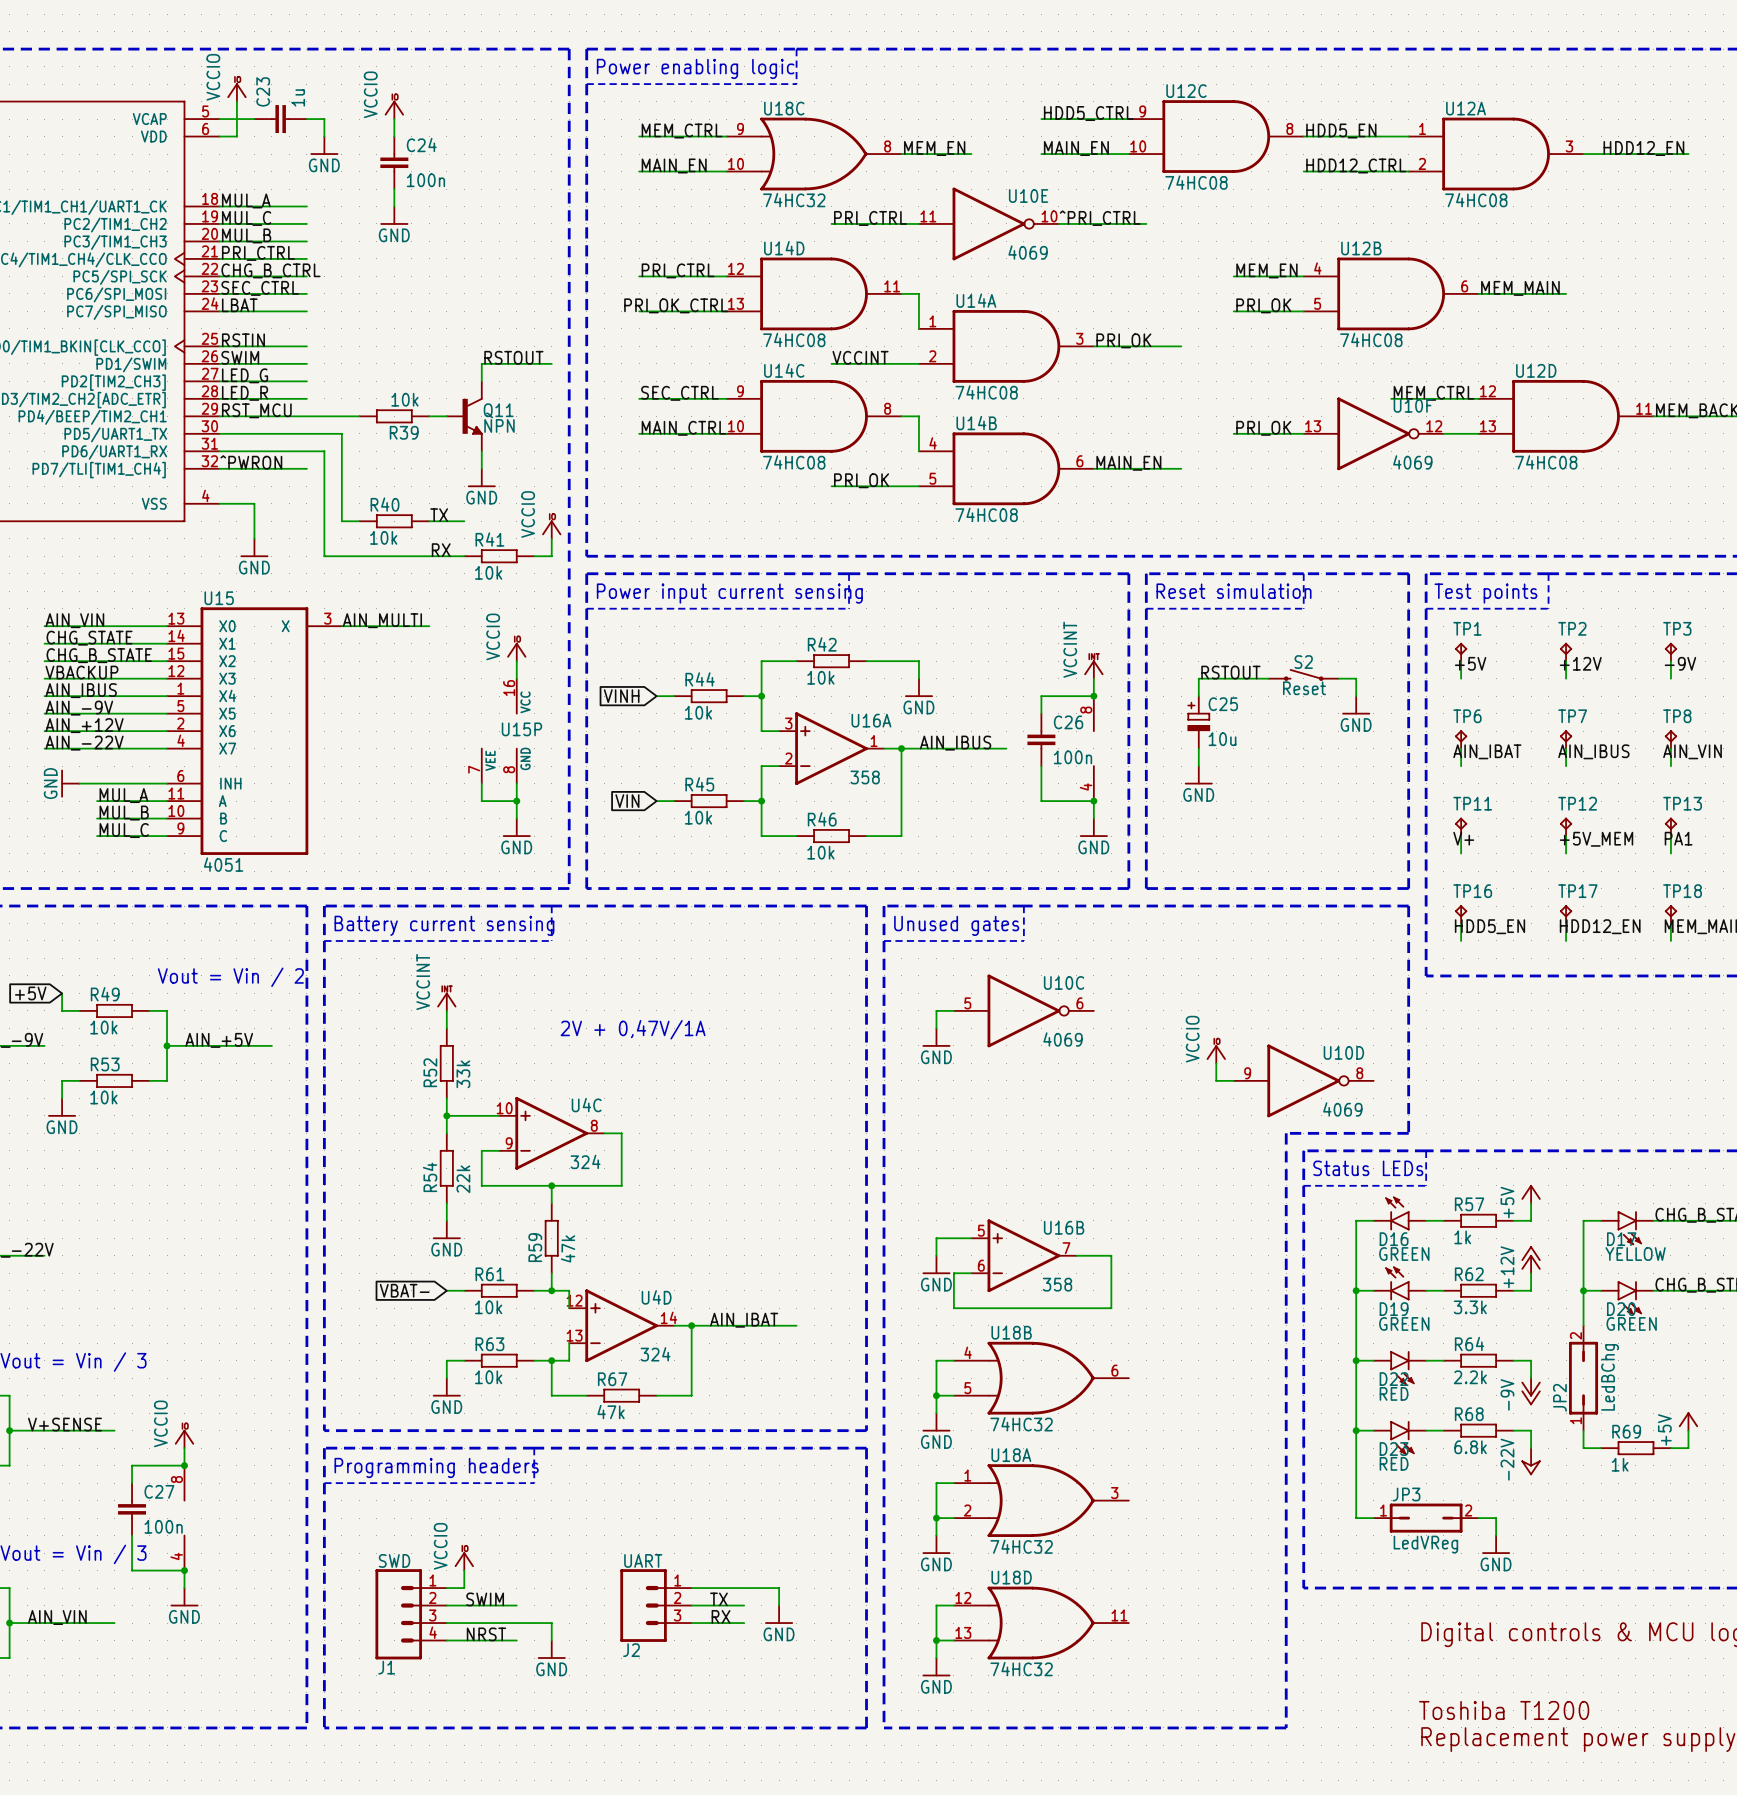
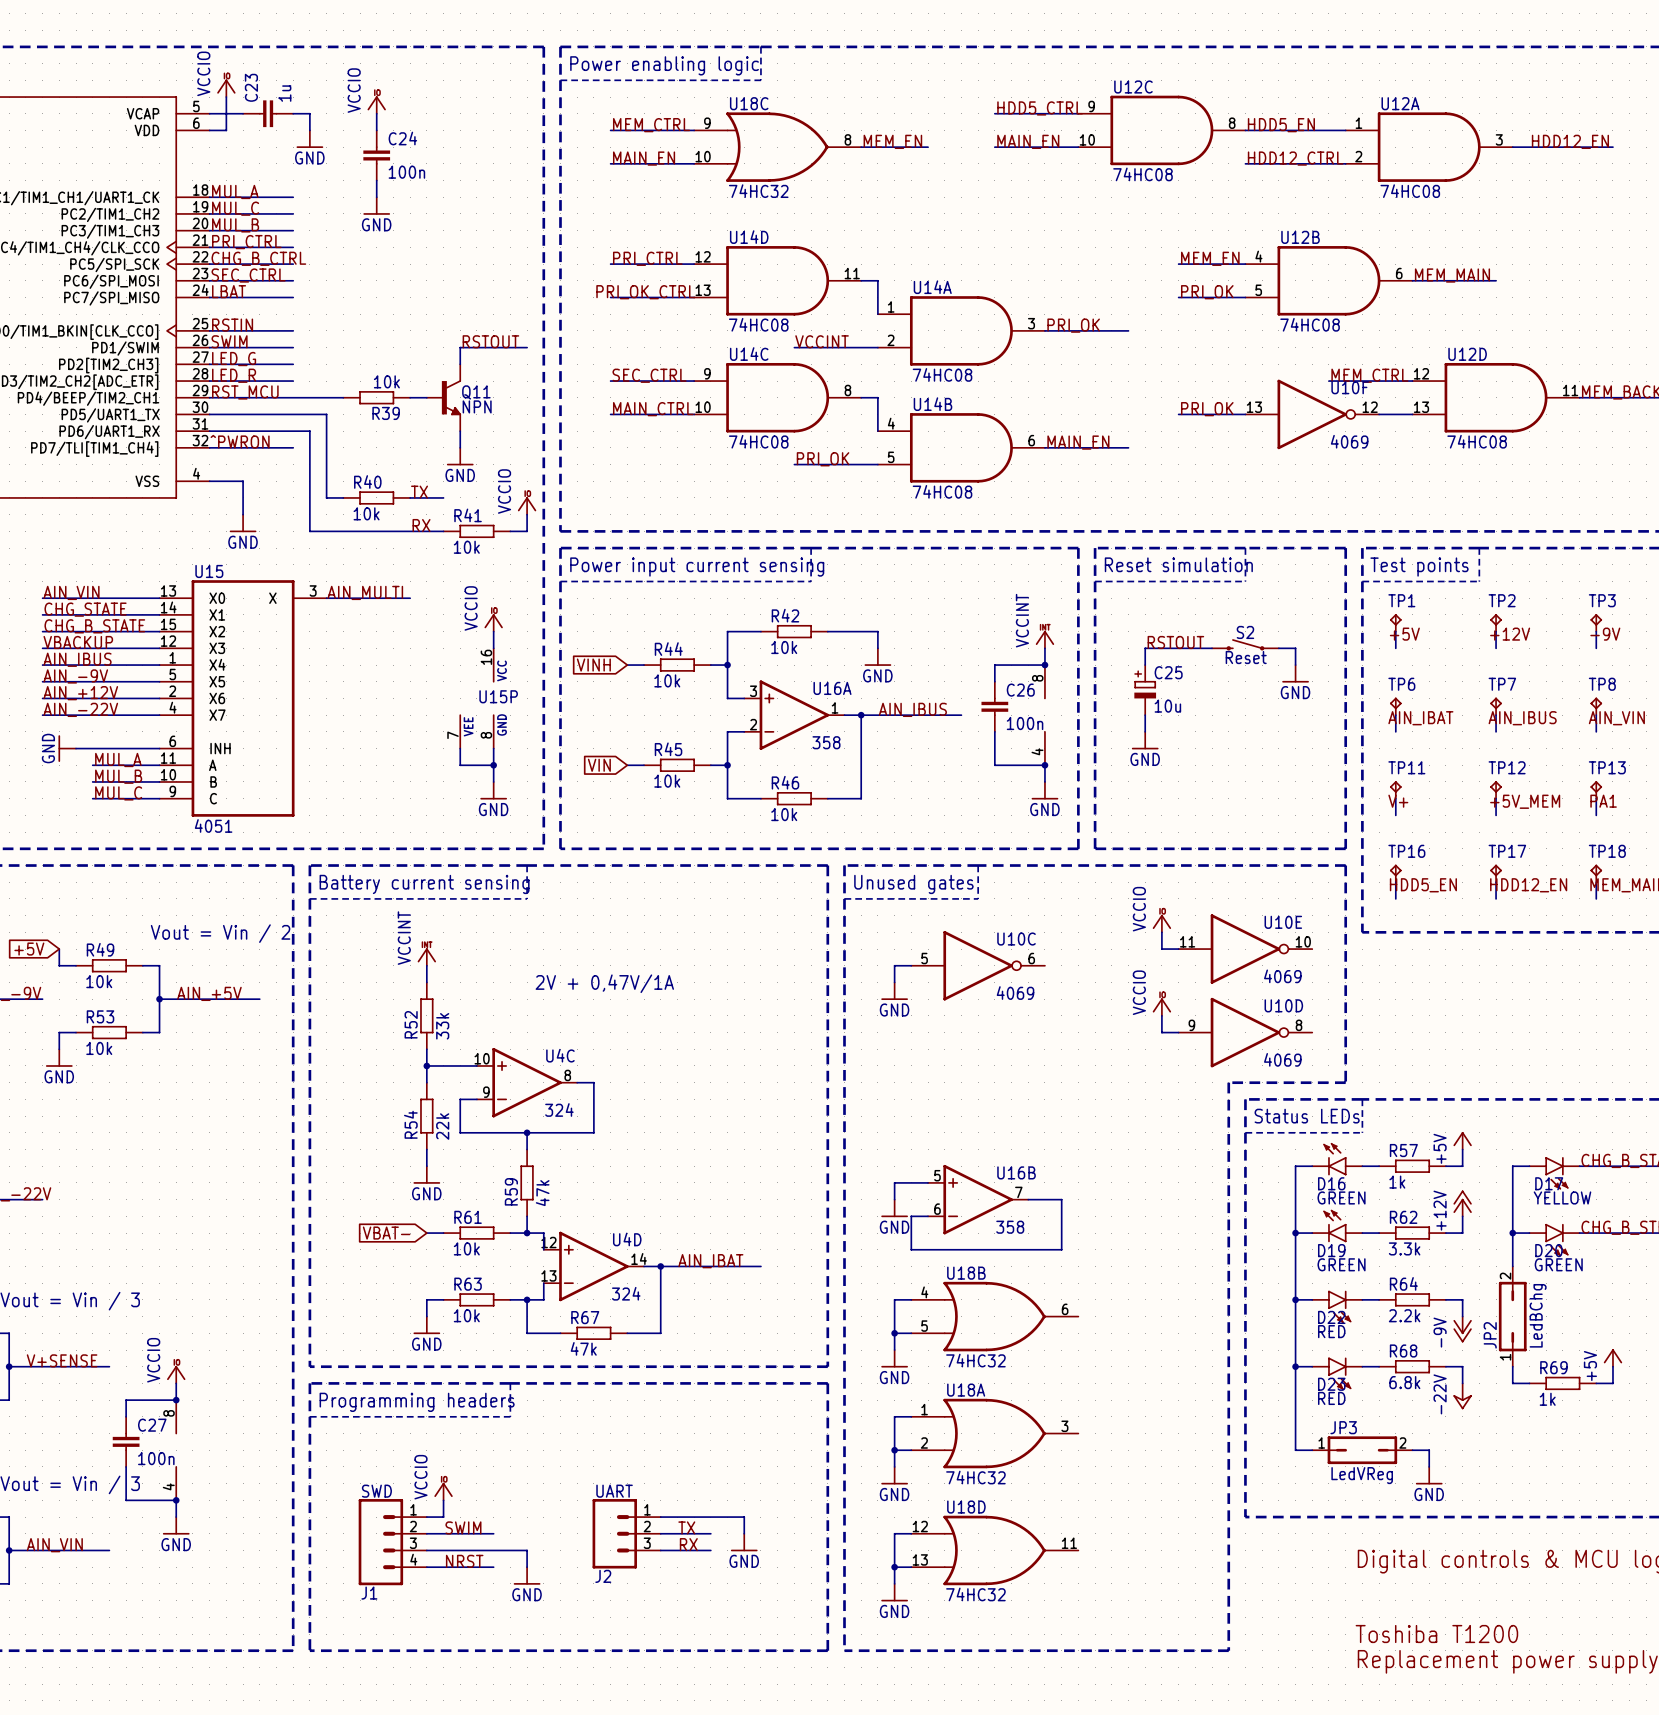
label: PRI_CTRL (870, 218) -> none
label: ^PRI_CTRL (1100, 218) -> none
wire: (831, 223) (918, 223) -> none
U10E position: (988, 223) -> (1245, 949)
wire: (1058, 223) (1146, 223) -> none
power symbol: none -> VCCIO (1161, 923)
wire: none -> (1161, 932) (1161, 949) (1178, 949)

